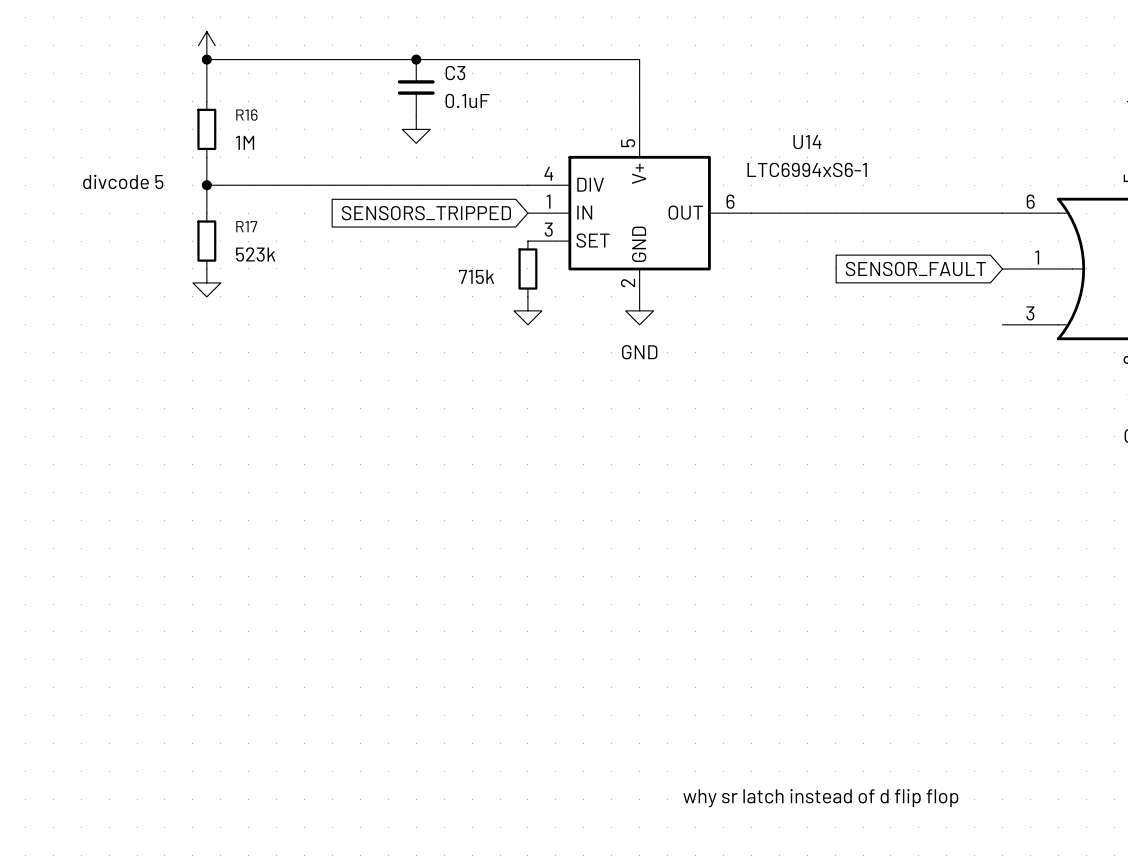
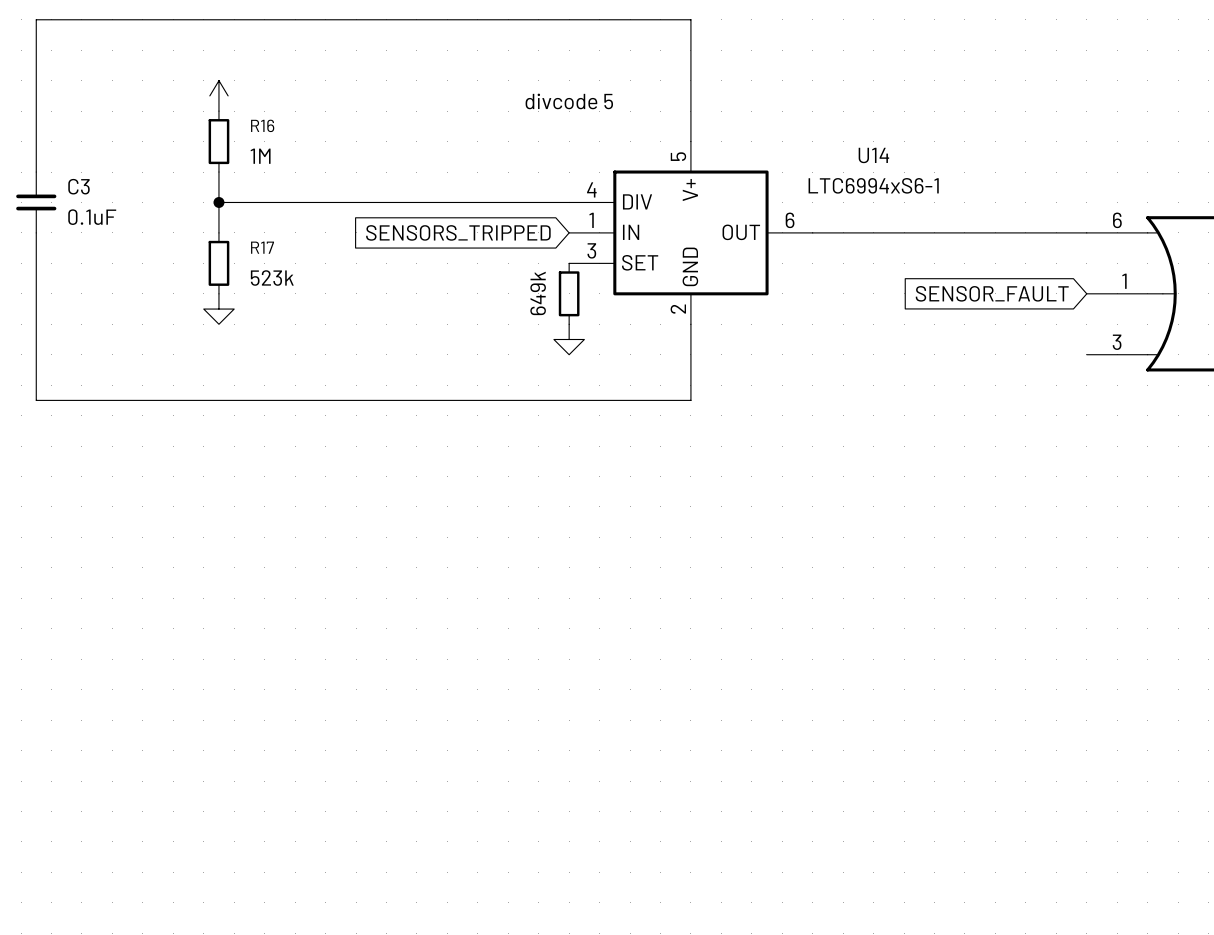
power symbol position: (206, 45) -> (218, 95)
junction: (206, 59) -> none
junction: (416, 59) -> none
wire: (639, 59) (206, 59) (206, 101) -> (690, 65) (690, 19) (36, 19) (36, 172)
C3 position: (416, 87) -> (36, 202)
text: none -> divcode 5 (569, 101)
power symbol: (416, 129) -> none
text: divcode 5 (123, 181) -> none
wire: none -> (36, 232) (36, 400) (690, 400) (690, 324)
part value: 715k (476, 276) -> 649k (538, 293)
power symbol: GND (639, 310) -> none
text: why sr latch instead of d flip flop (820, 798) -> none

